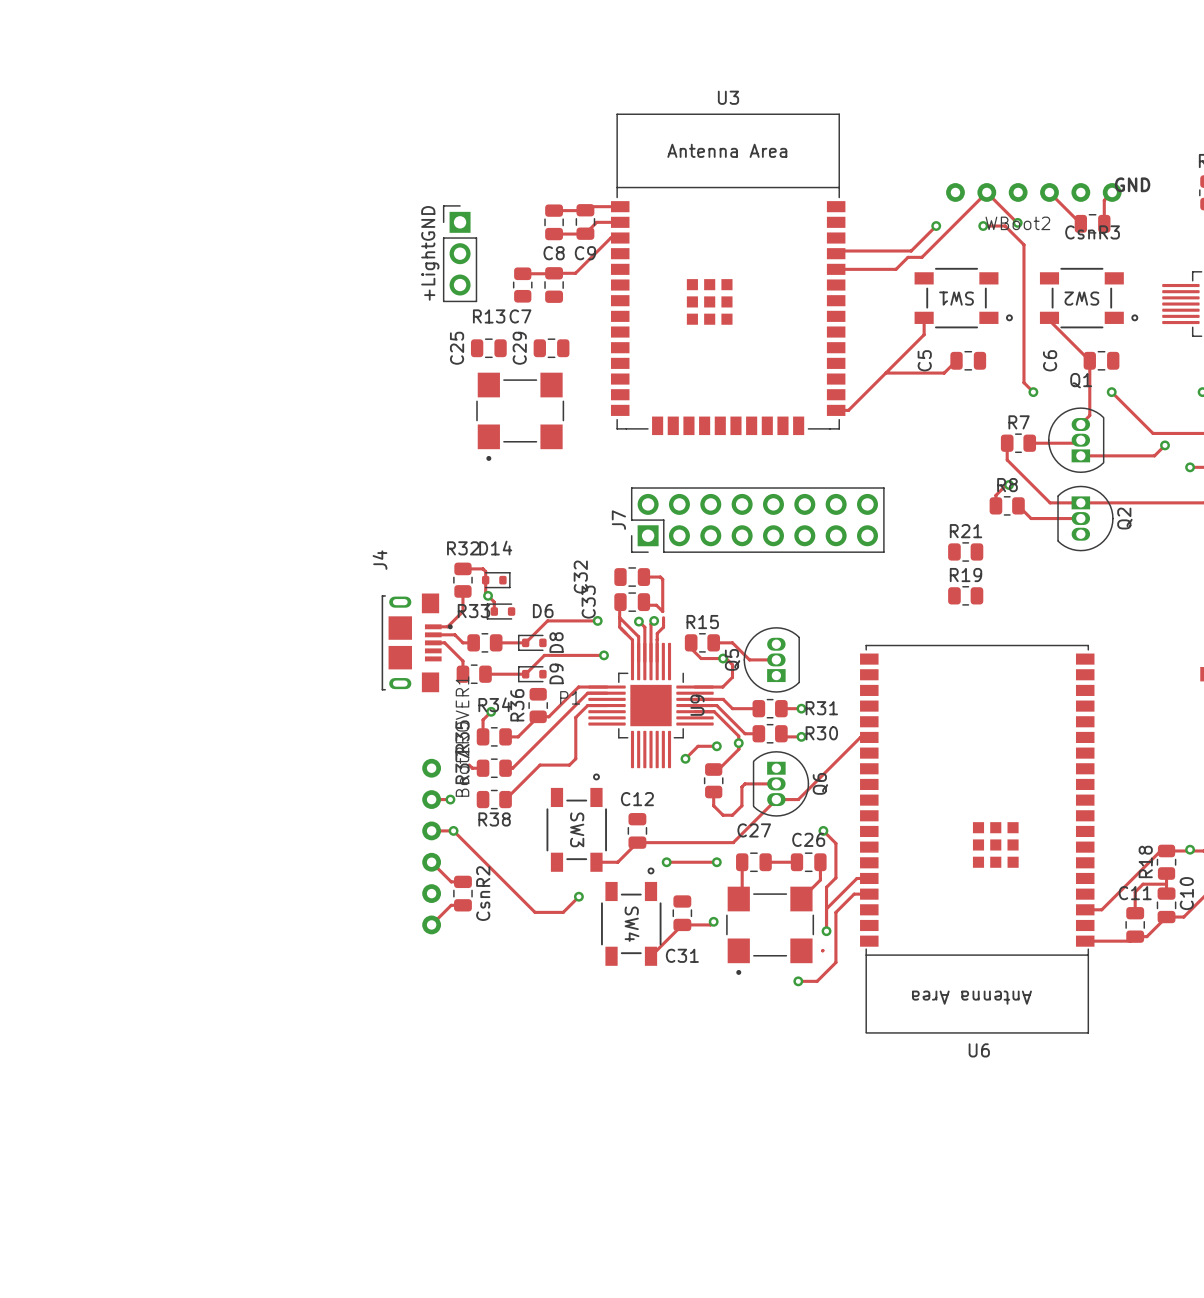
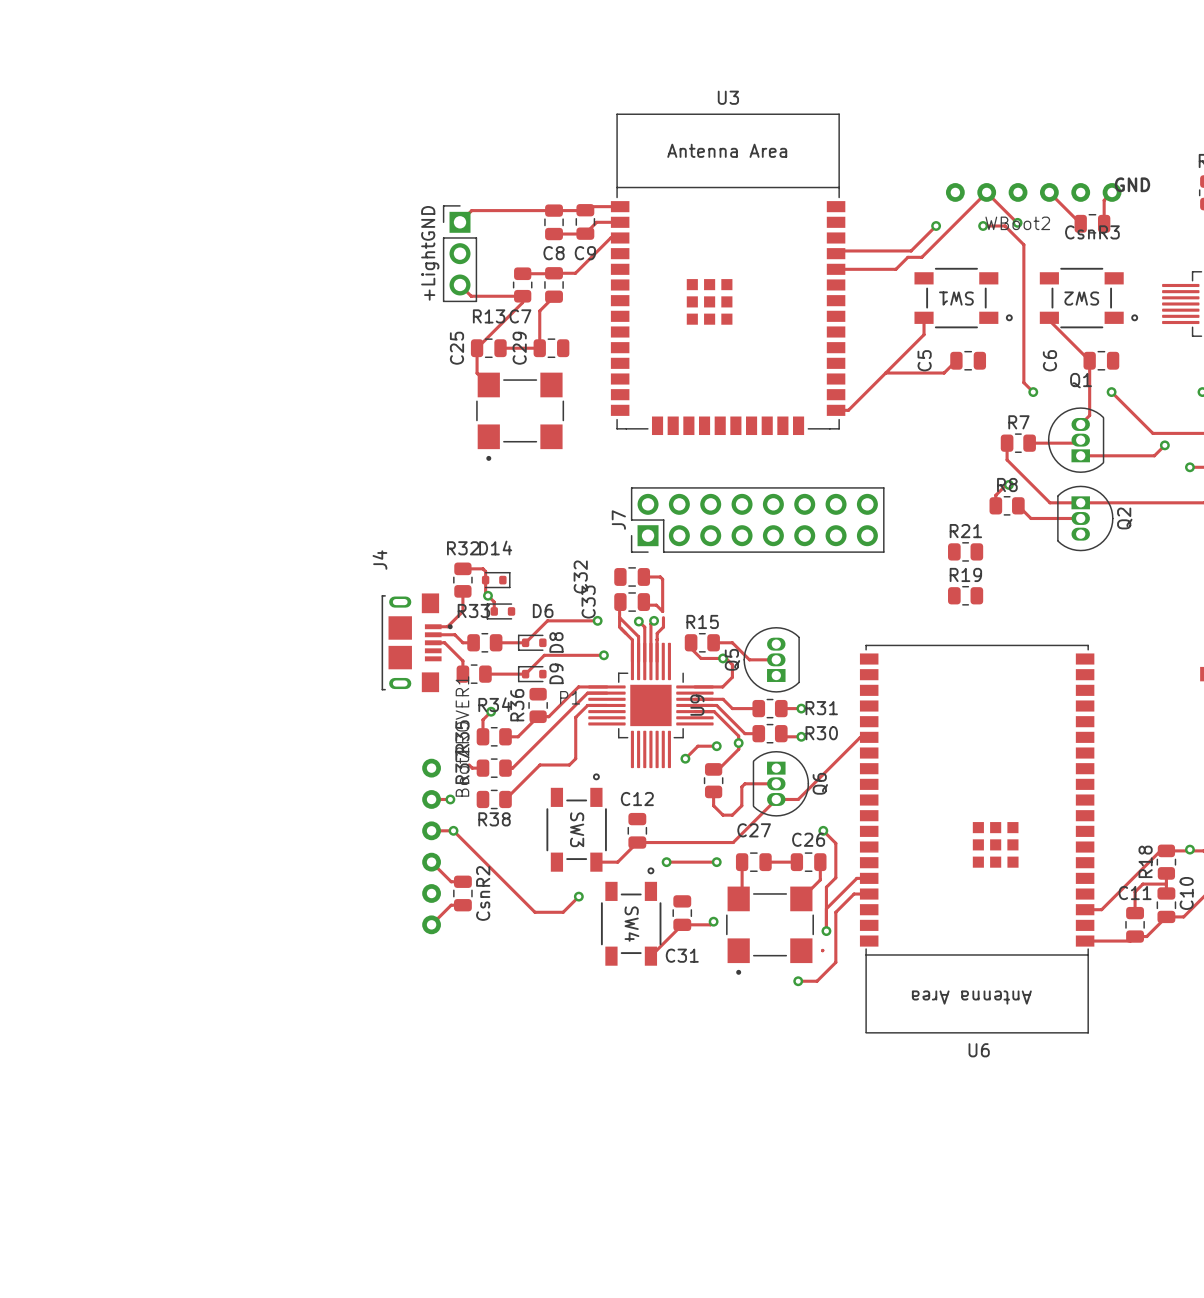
track: none -> (554, 210) (471, 210) (460, 222)
track: none -> (460, 284) (471, 296) (522, 296) (522, 302) (477, 348) (477, 373) (488, 384)
track: none -> (554, 296) (539, 310) (539, 348) (500, 348)

